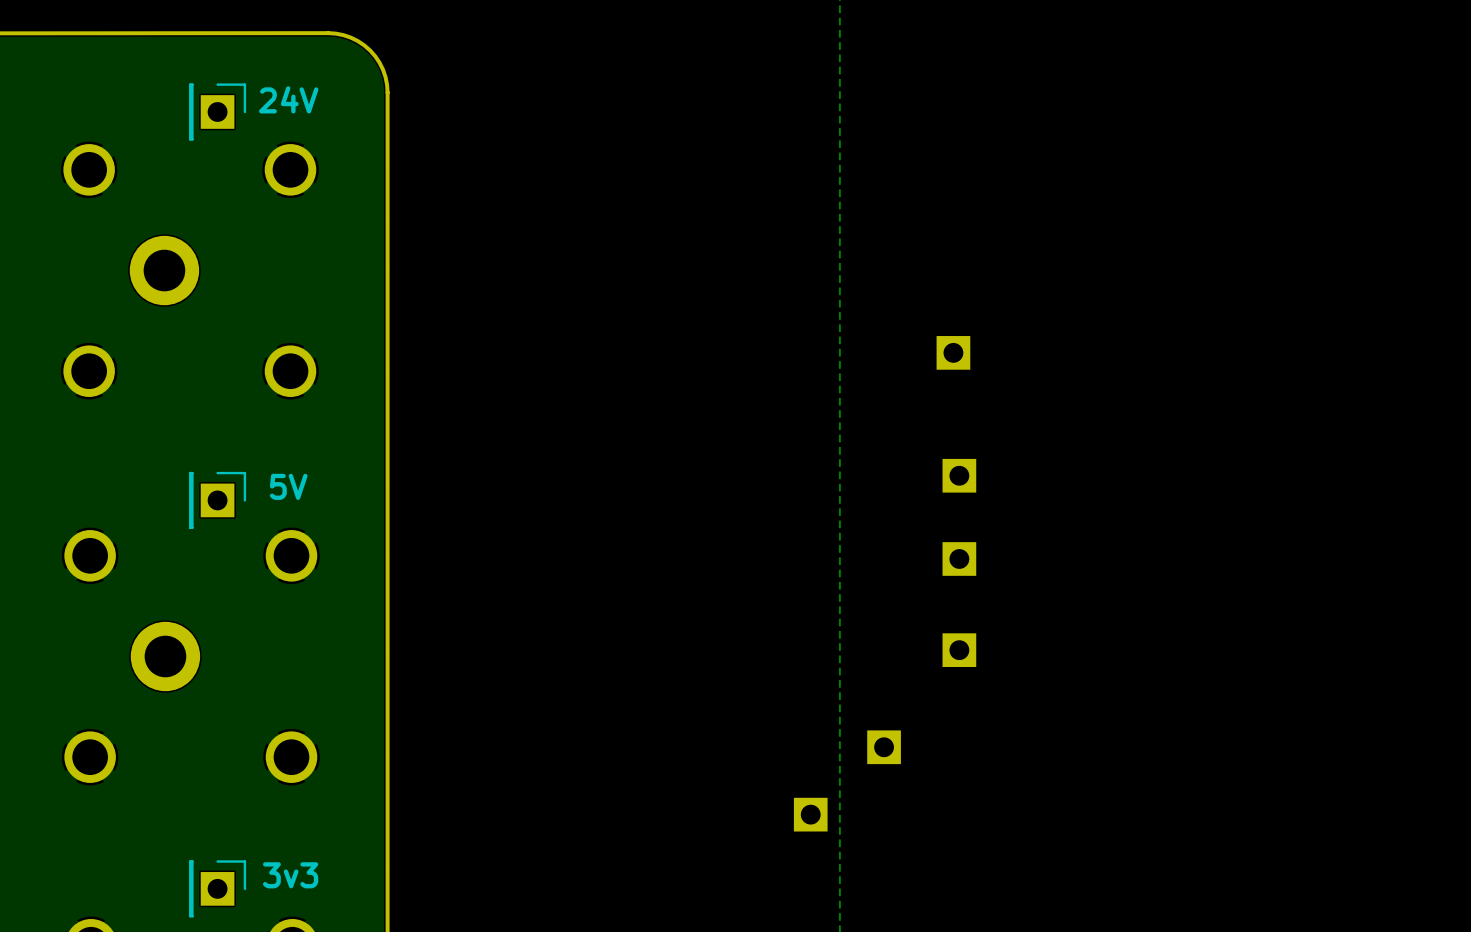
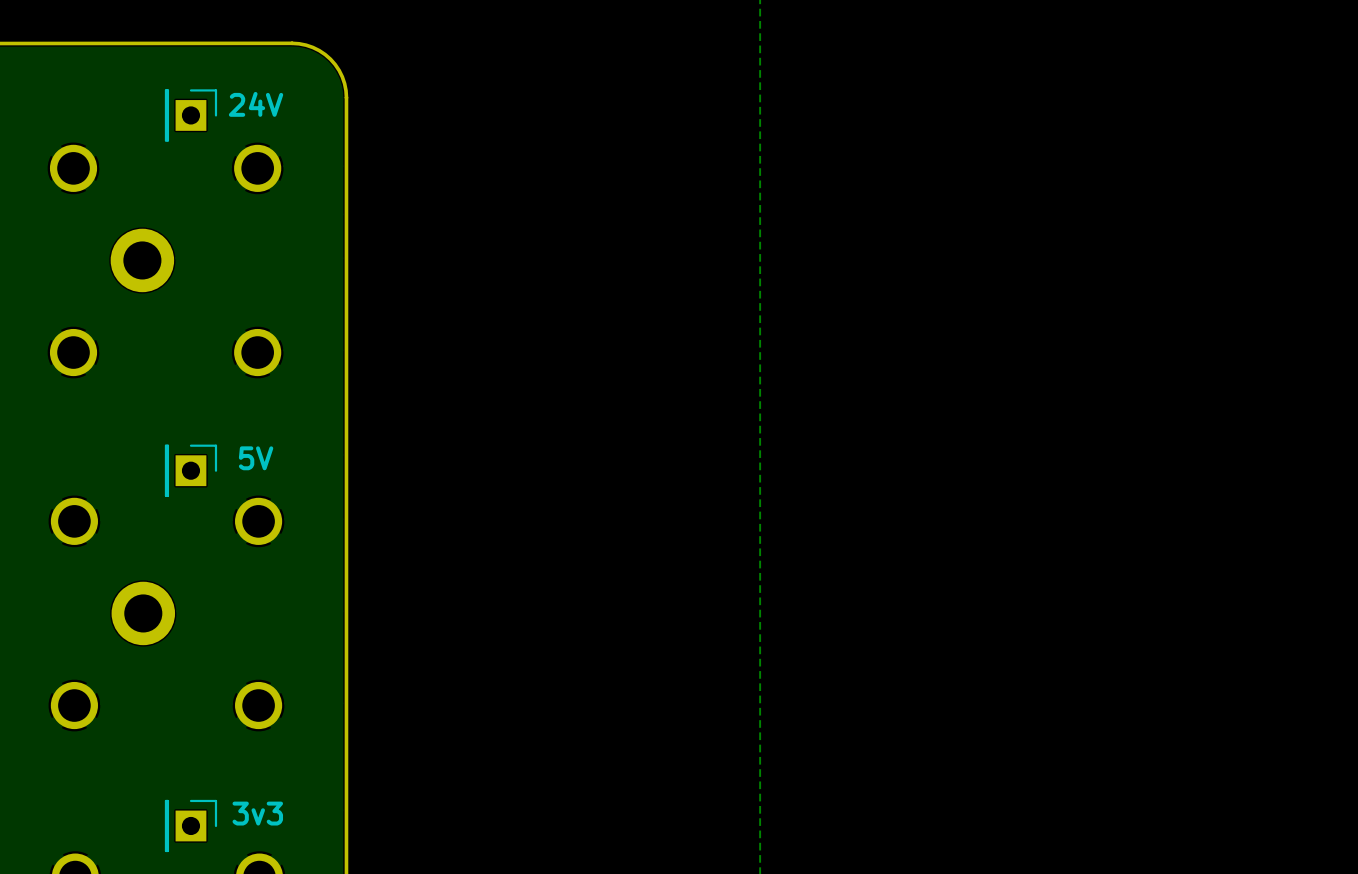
part: (953, 352) -> none
part: (959, 475) -> none
part: (959, 558) -> none
part: (959, 650) -> none
part: (884, 747) -> none
part: (810, 814) -> none

